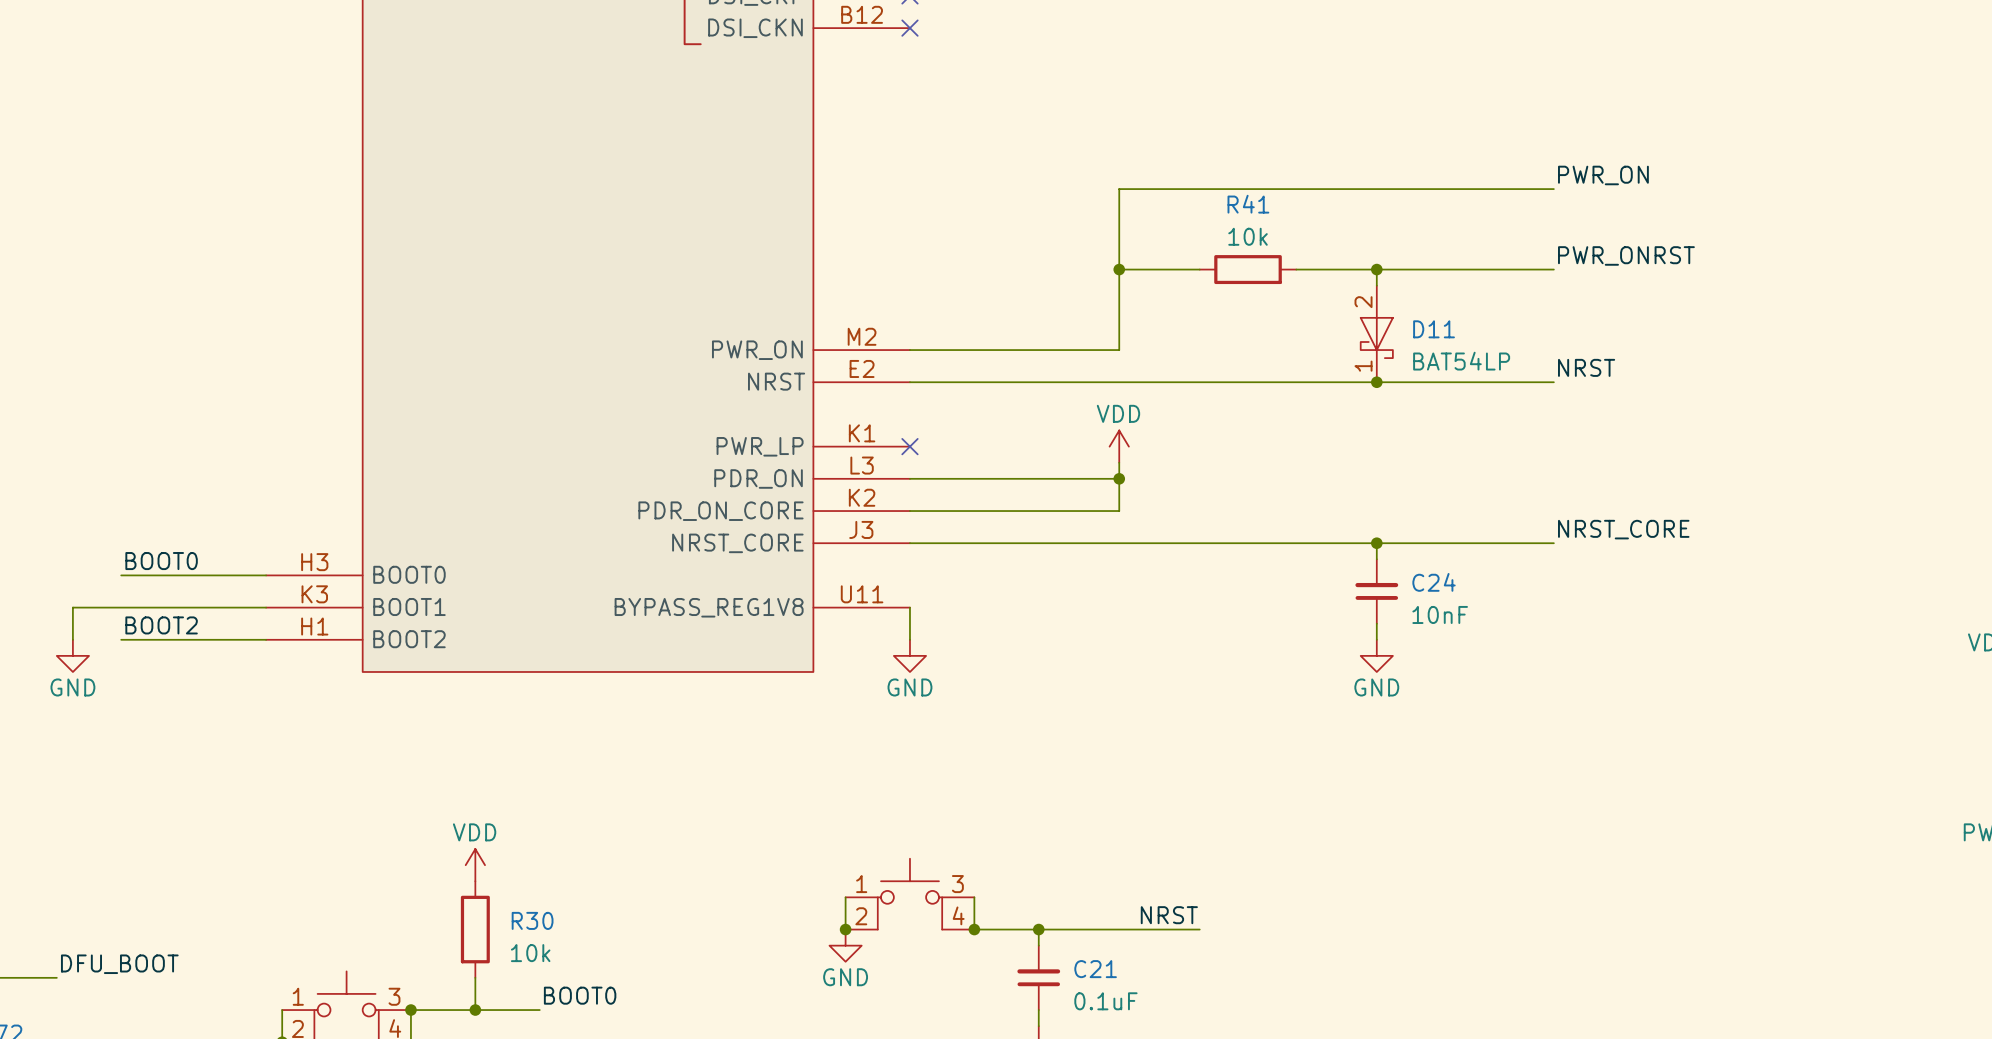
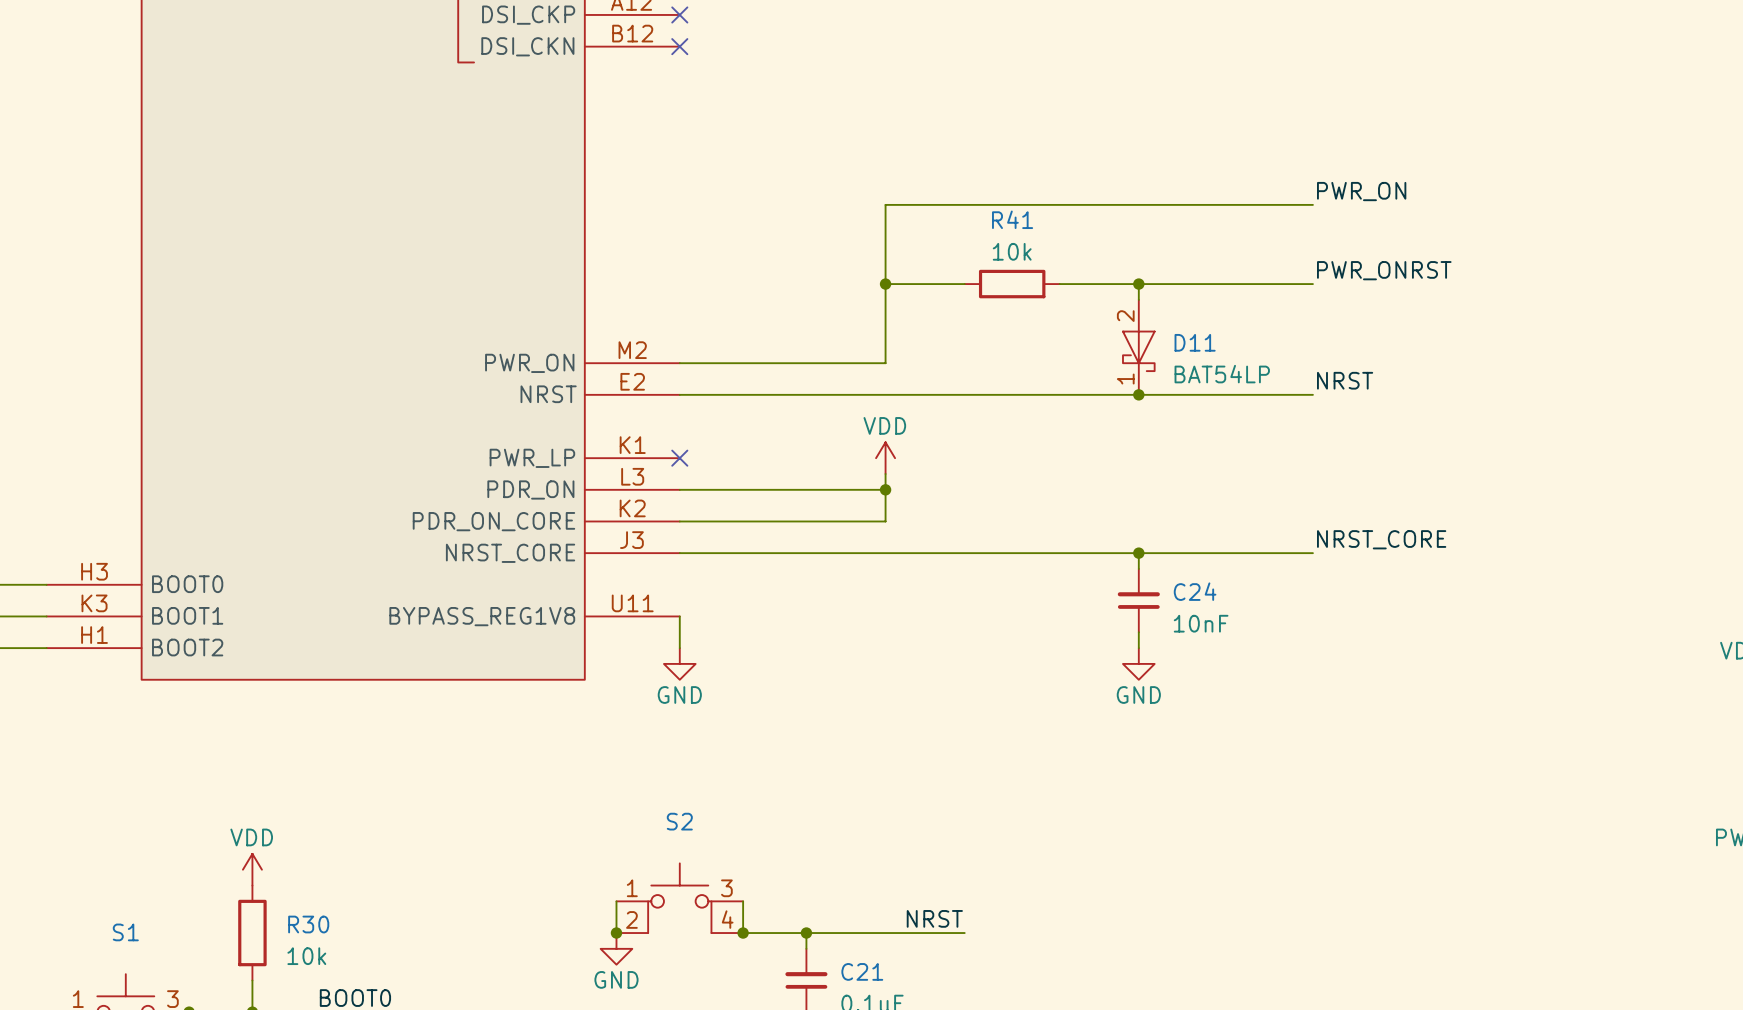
S2 name: none -> S2 (679, 821)
S1 name: none -> S1 (125, 932)

